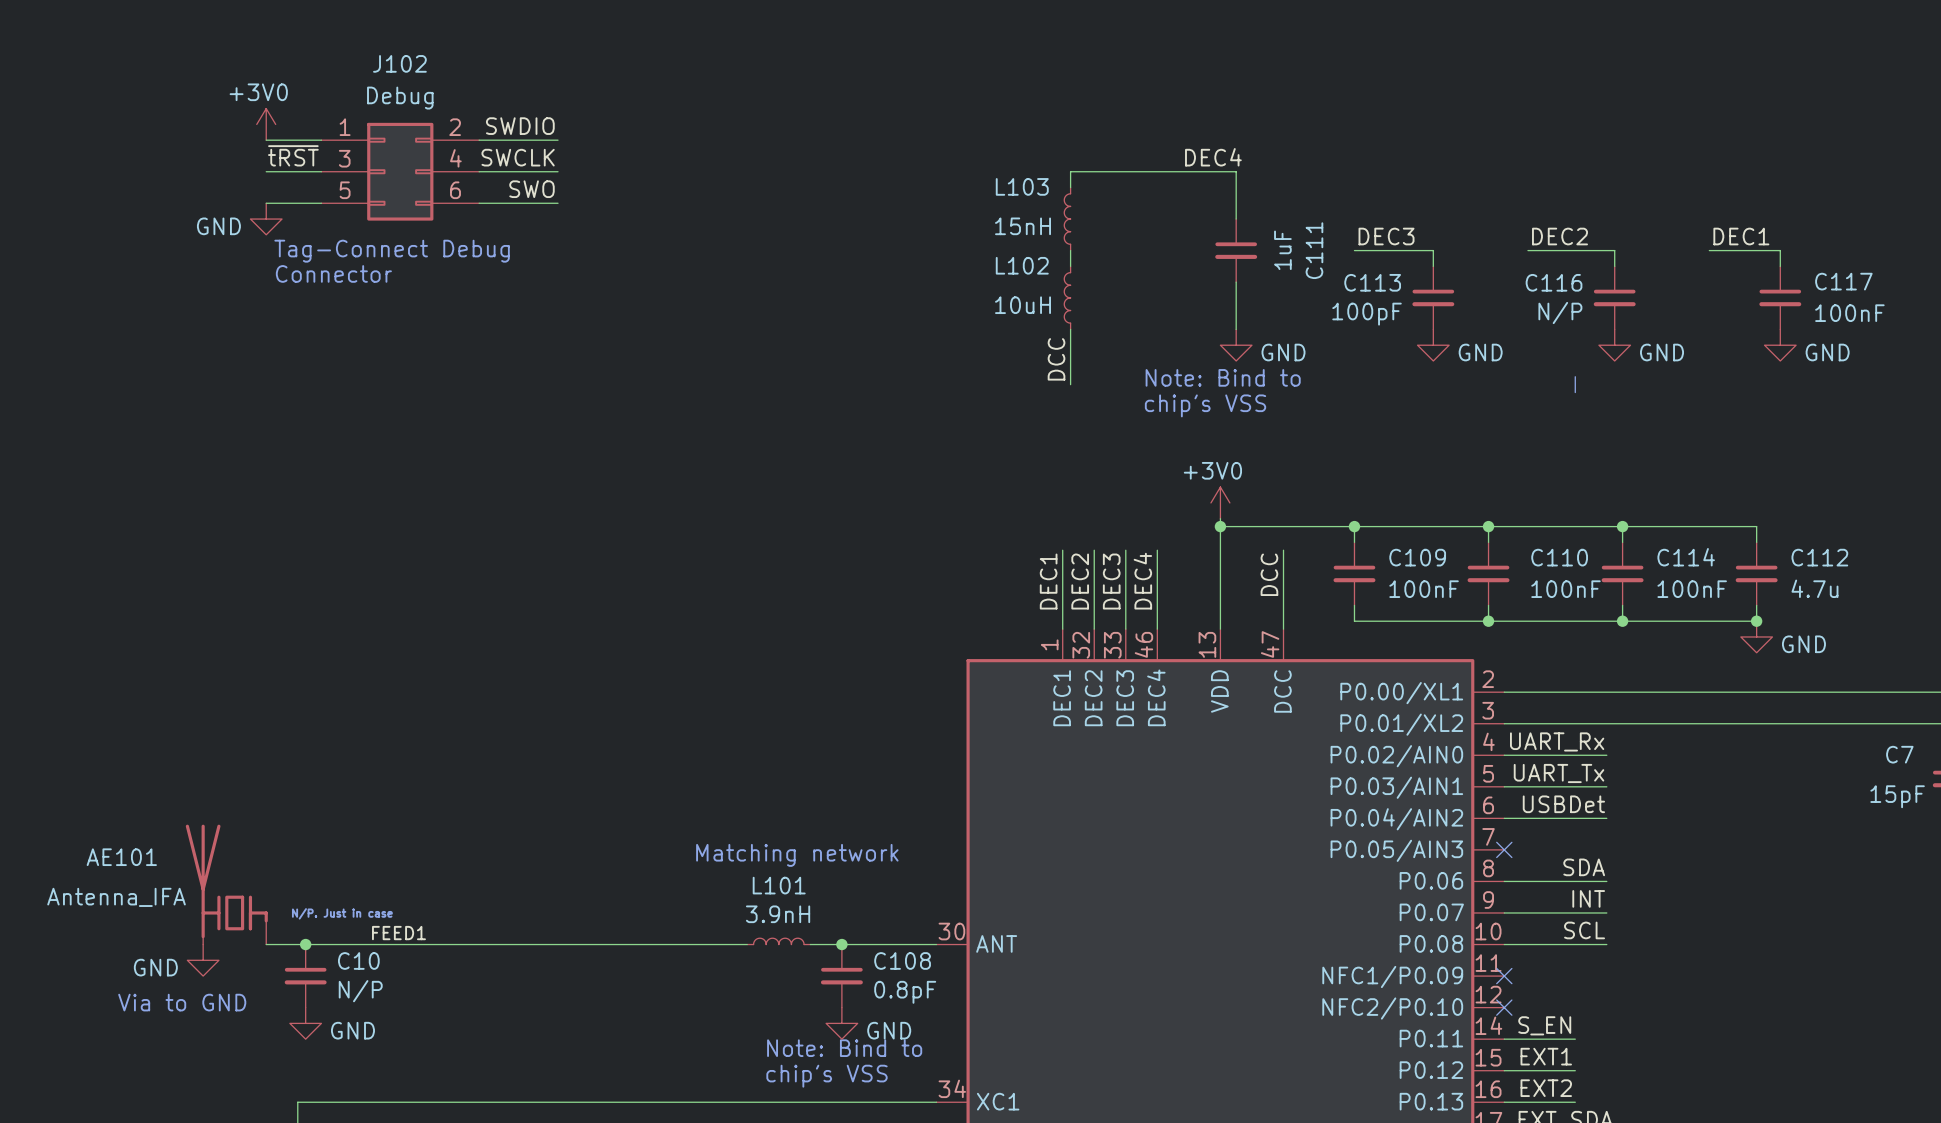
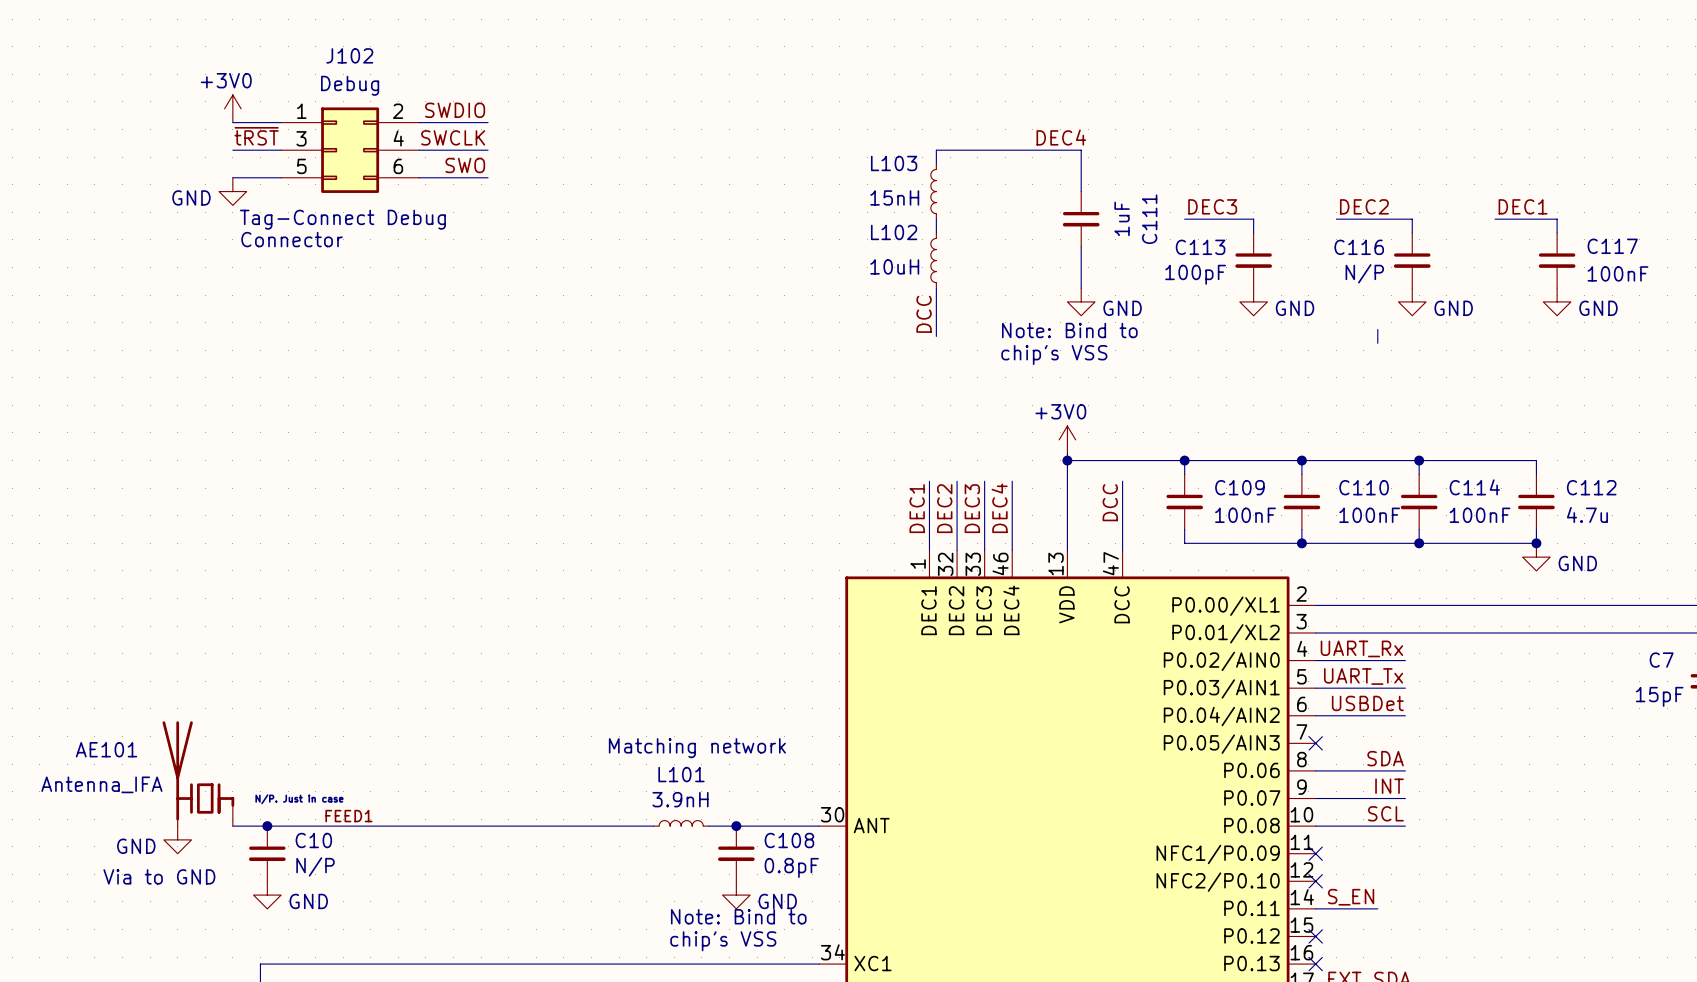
label: EXT1 (1546, 1056) -> none
wire: (1504, 1070) (1575, 1070) -> none
no-connect mark: none -> (1315, 936)
label: EXT2 (1546, 1088) -> none
wire: (1504, 1102) (1575, 1102) -> none
no-connect mark: none -> (1315, 964)

